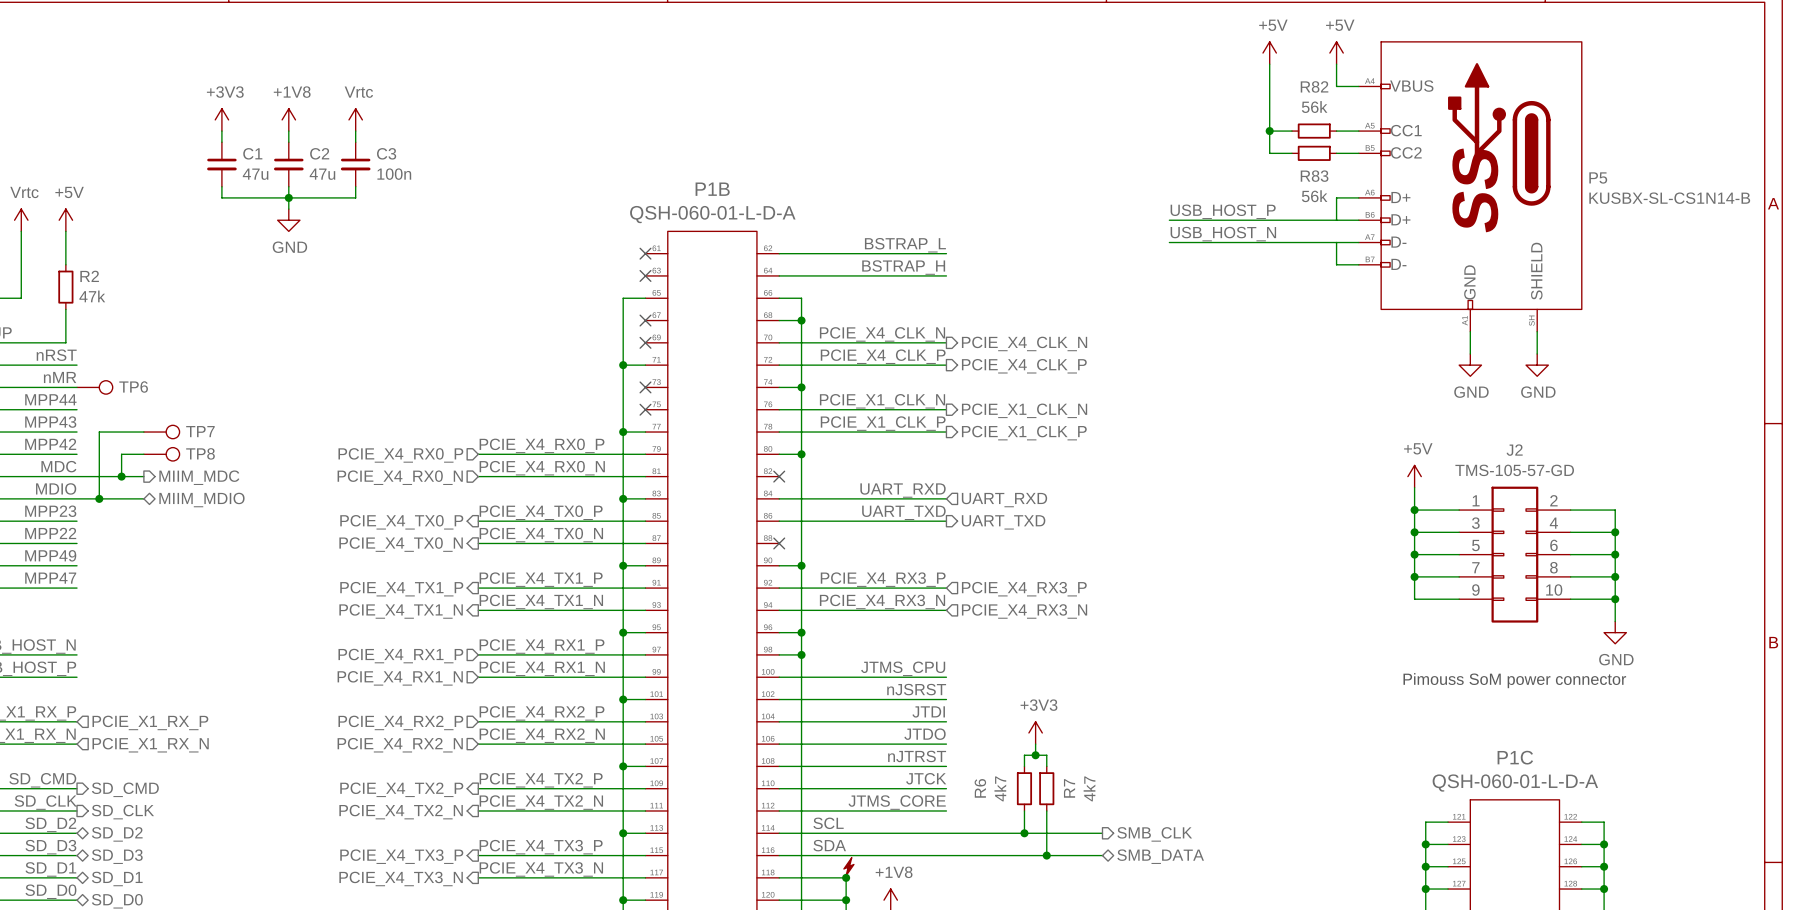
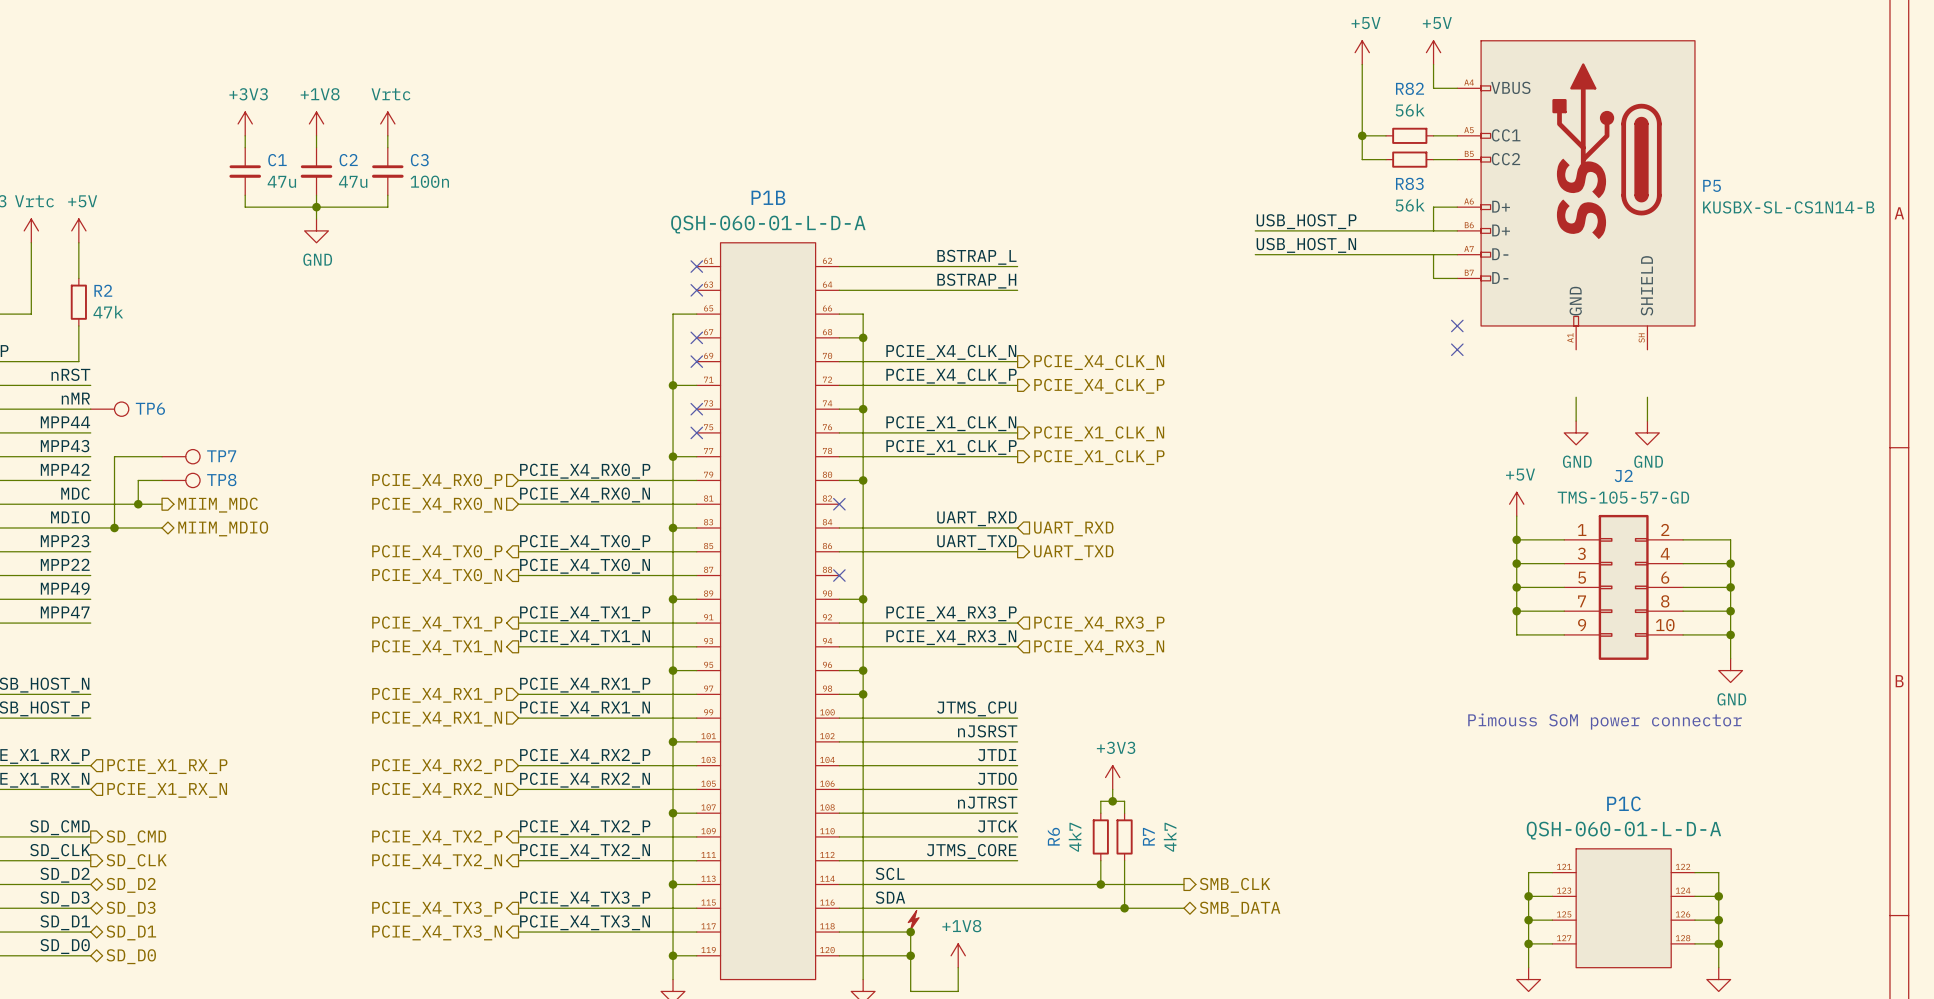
no-connect mark: none -> (1457, 325)
no-connect mark: none -> (1457, 349)
wire: (1470, 331) (1470, 353) -> (1576, 397) (1576, 421)
wire: (1537, 331) (1537, 353) -> (1647, 397) (1647, 421)
power symbol: GND (1470, 365) -> none
power symbol: GND (1537, 365) -> none
power symbol: none -> GND (1576, 432)
power symbol: none -> GND (1647, 432)

